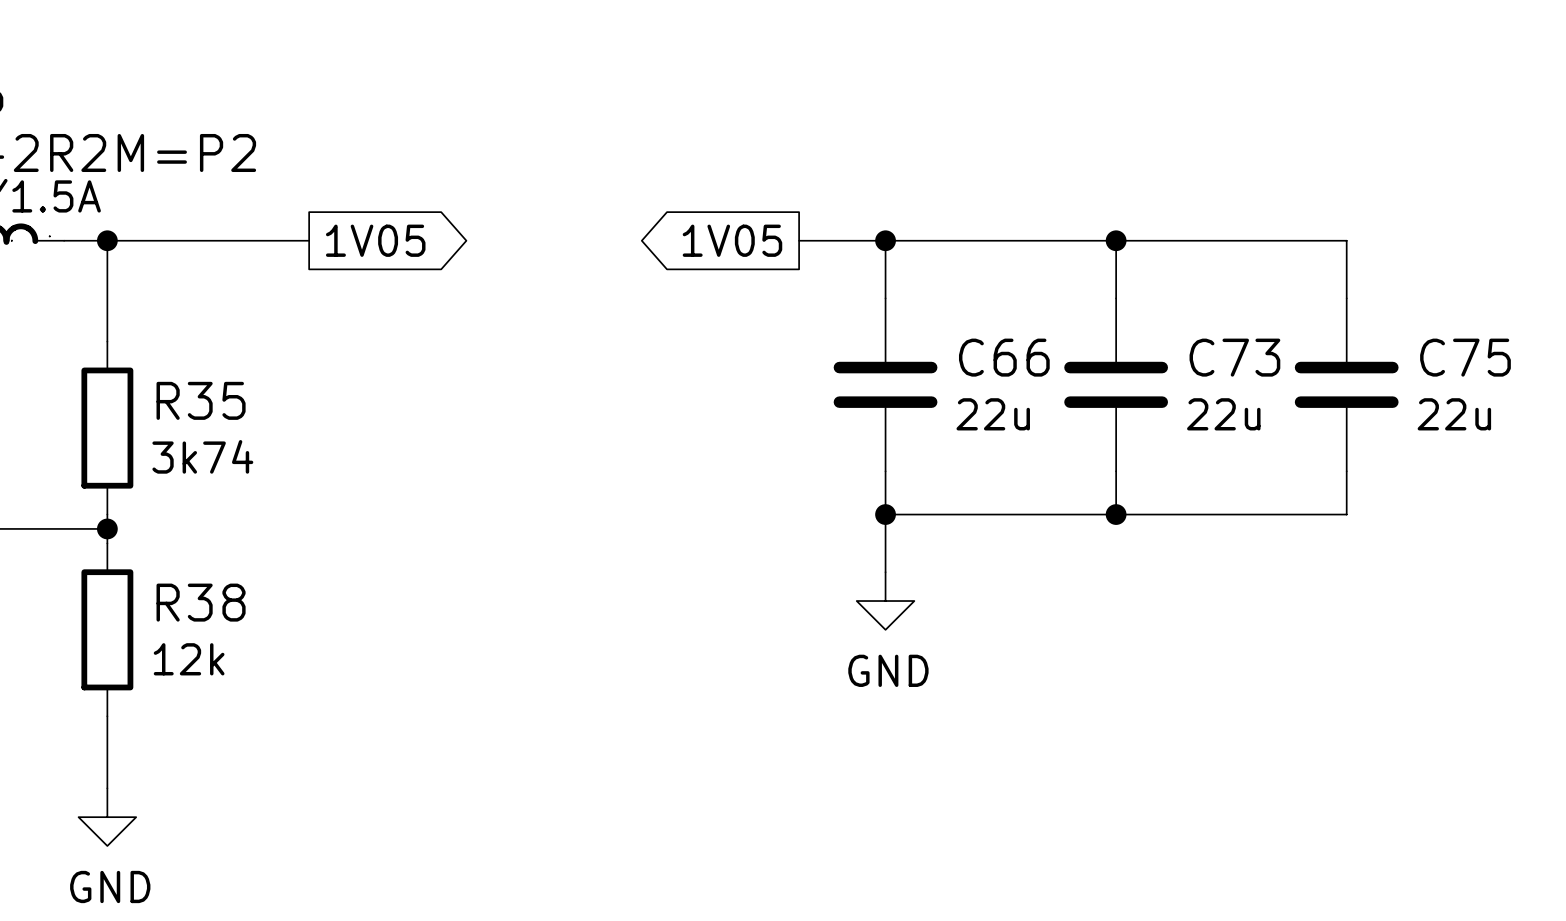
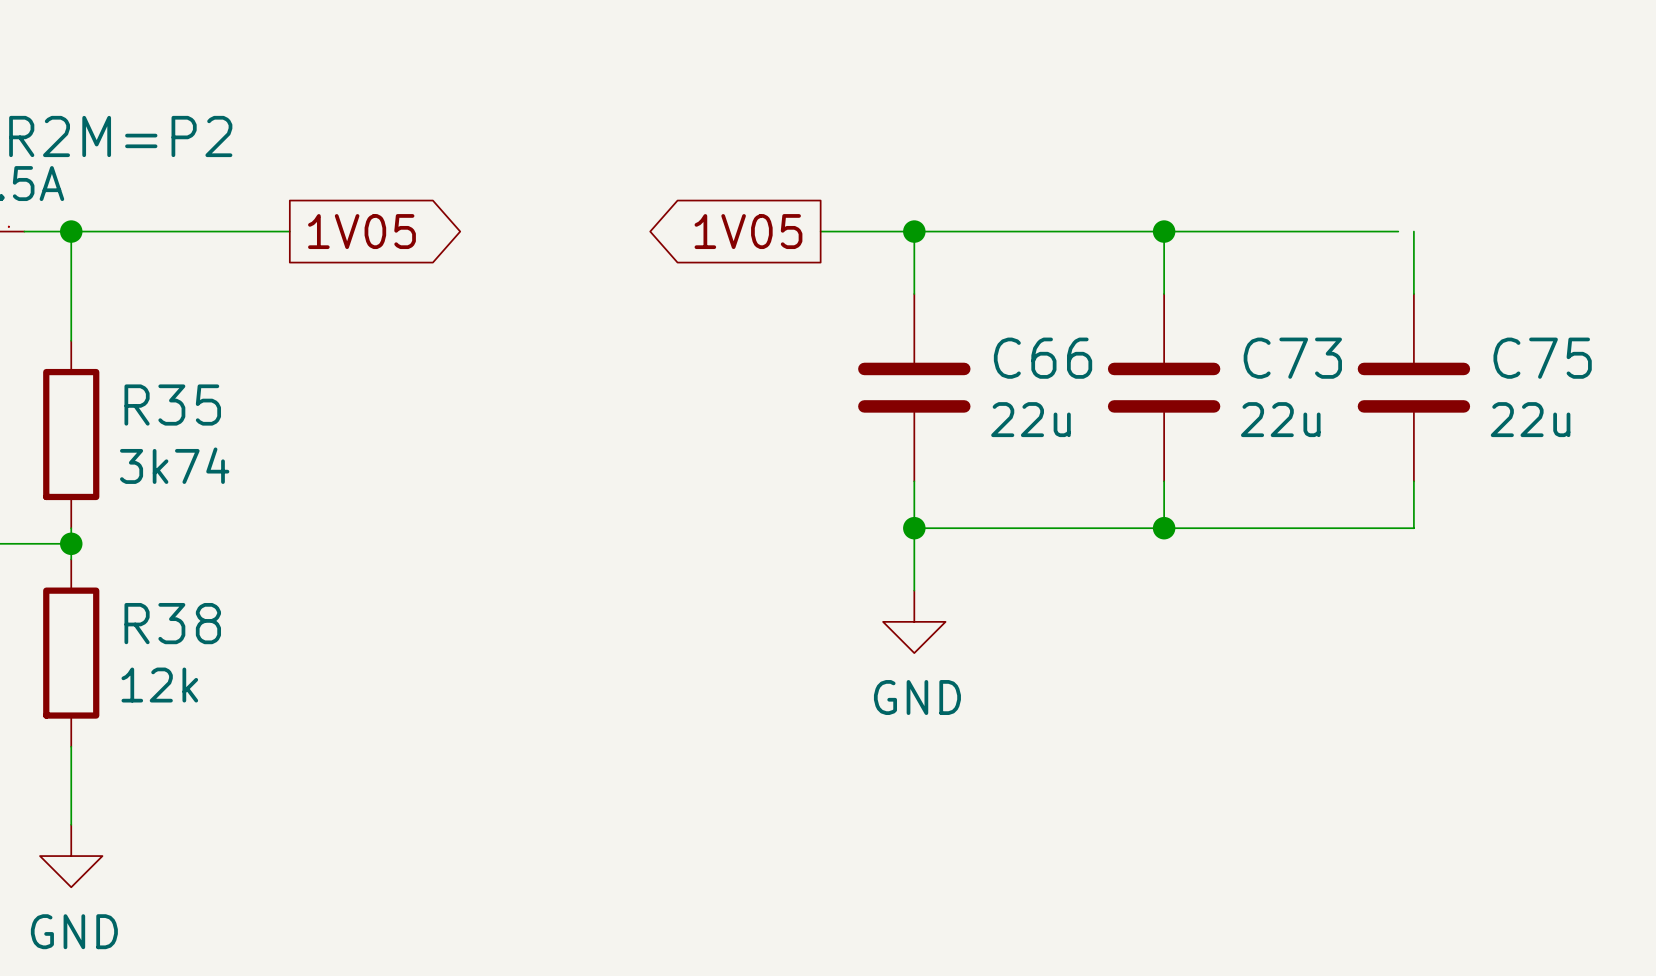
wire: (1332, 240) (1346, 240) -> none

